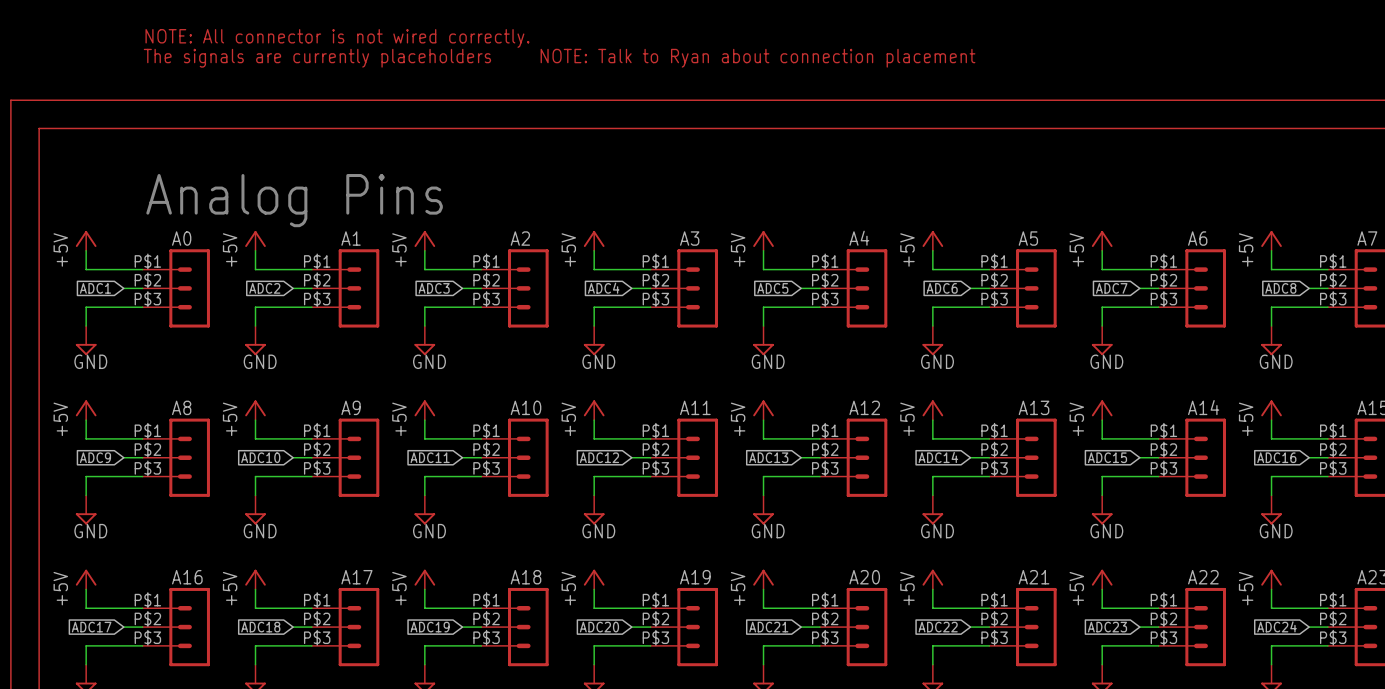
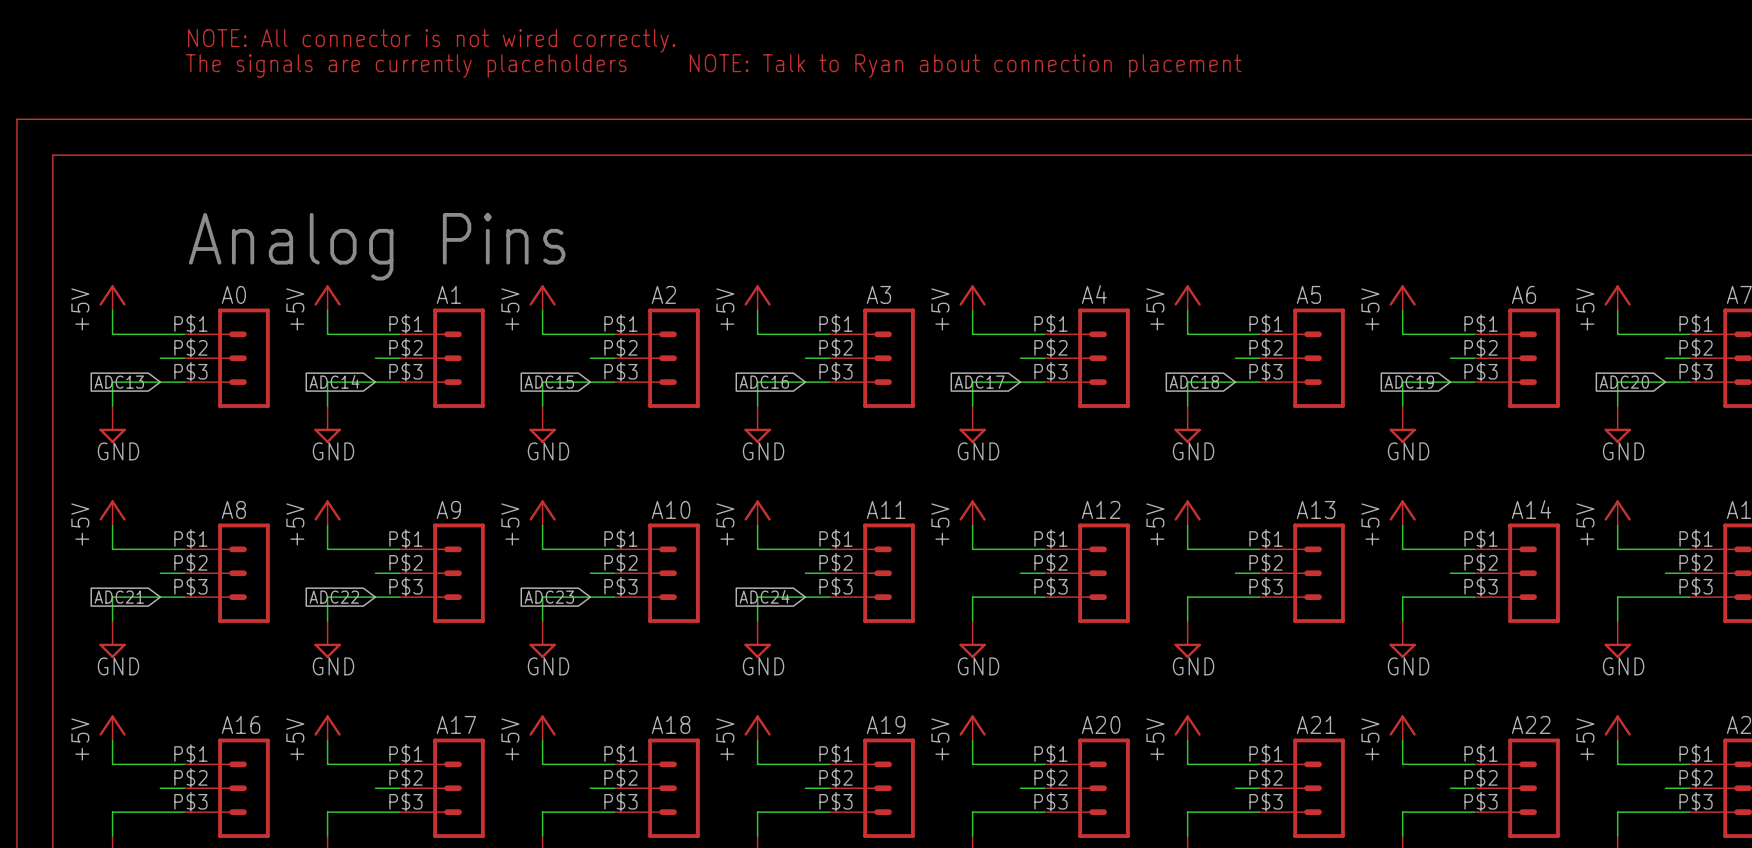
global label: ADC1 (95, 288) -> ADC13 (119, 382)
global label: ADC2 (264, 288) -> ADC14 (334, 381)
global label: ADC3 (434, 288) -> ADC15 (549, 382)
global label: ADC4 (603, 288) -> ADC16 (764, 382)
global label: ADC5 (772, 288) -> ADC17 (979, 382)
global label: ADC6 (942, 288) -> ADC18 (1194, 382)
global label: ADC7 (1111, 288) -> ADC19 (1409, 382)
global label: ADC8 (1280, 288) -> ADC20 (1624, 382)
global label: ADC9 (95, 457) -> ADC21 (119, 597)
global label: ADC10 (260, 457) -> none
global label: ADC11 (430, 457) -> none
global label: ADC12 (599, 457) -> ADC24 (764, 596)
global label: ADC13 (768, 457) -> none
global label: ADC14 (938, 457) -> none
global label: ADC15 (1107, 457) -> none
global label: ADC16 (1276, 457) -> none
global label: none -> ADC22 (334, 597)
global label: none -> ADC23 (549, 597)
global label: ADC24 (1277, 626) -> none
global label: ADC17 (91, 627) -> none
global label: ADC18 (260, 627) -> none
global label: ADC19 (430, 627) -> none
global label: ADC20 (599, 627) -> none
global label: ADC21 (768, 627) -> none
global label: ADC22 (938, 627) -> none
global label: ADC23 (1107, 627) -> none

